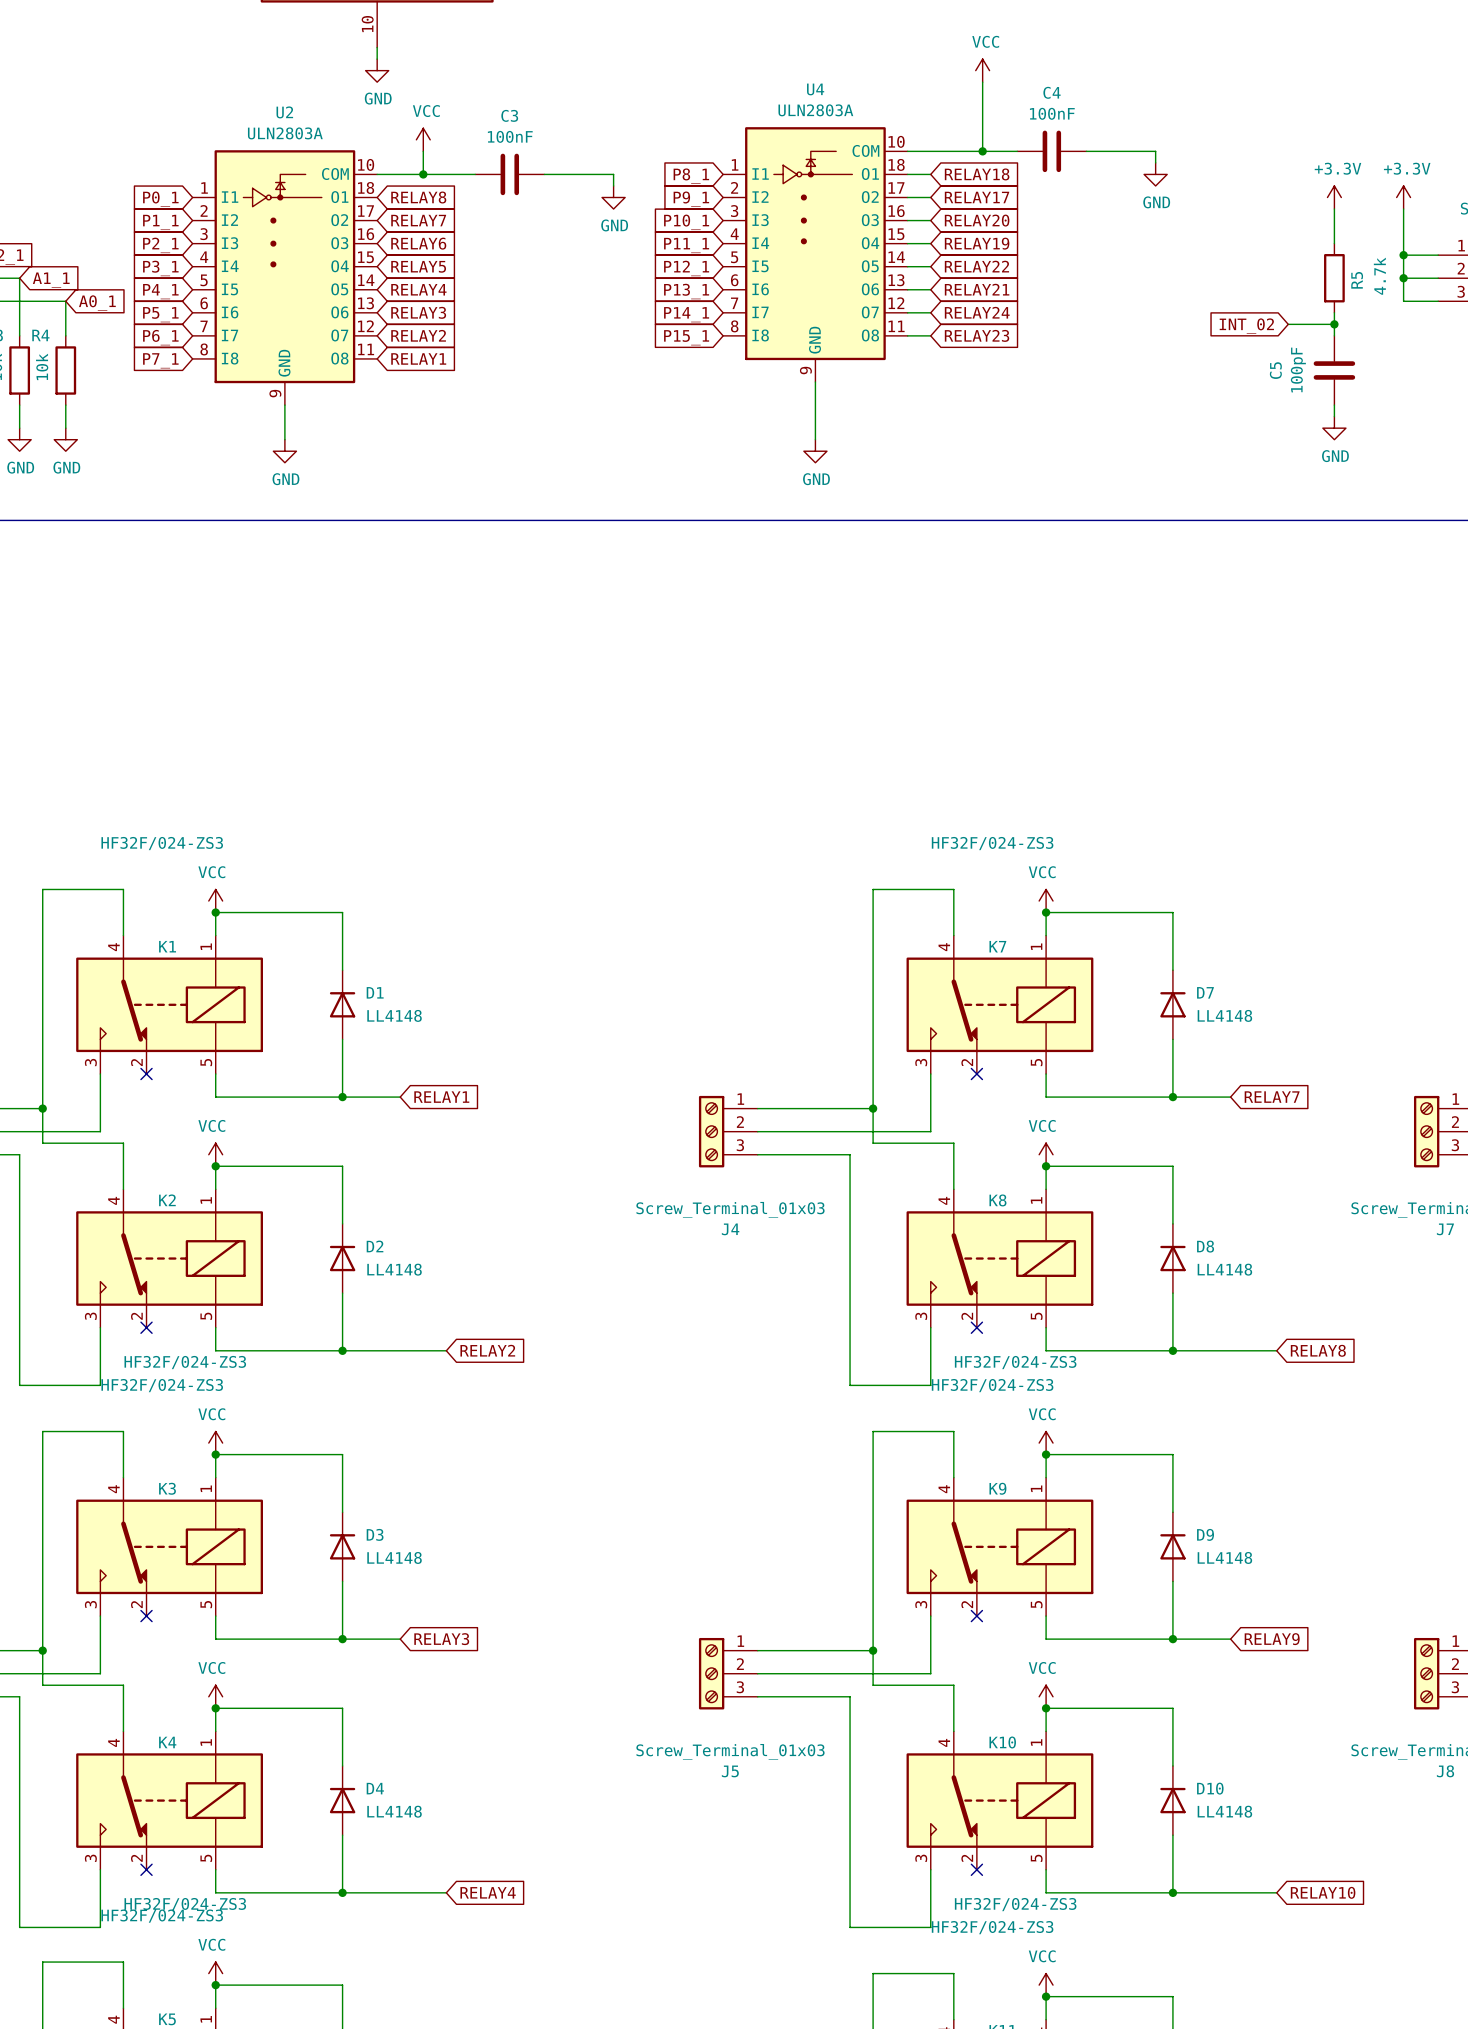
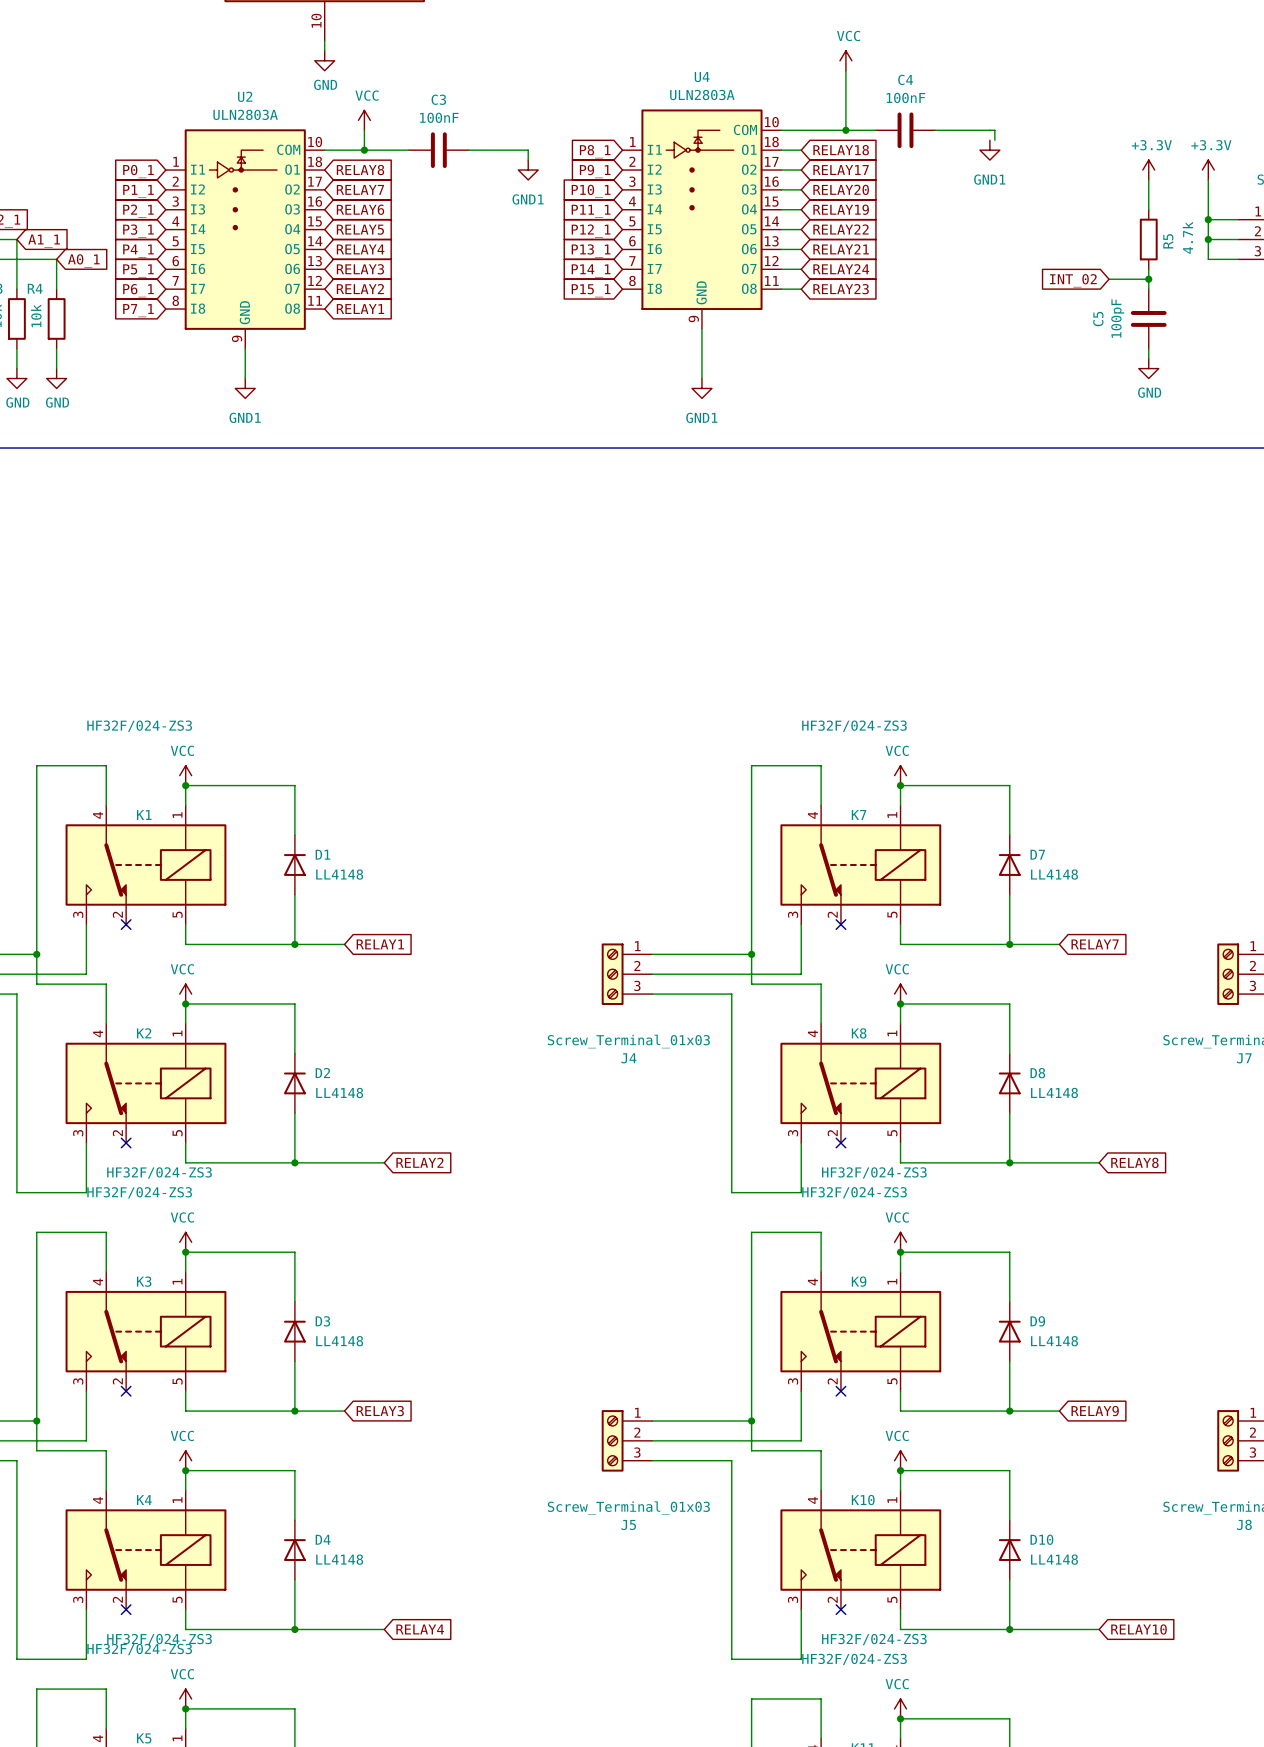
power symbol: GND (1155, 174) -> GND1 (989, 150)
power symbol: GND (613, 197) -> GND1 (528, 170)
power symbol: GND (284, 451) -> GND1 (245, 388)
power symbol: GND (815, 451) -> GND1 (701, 388)

